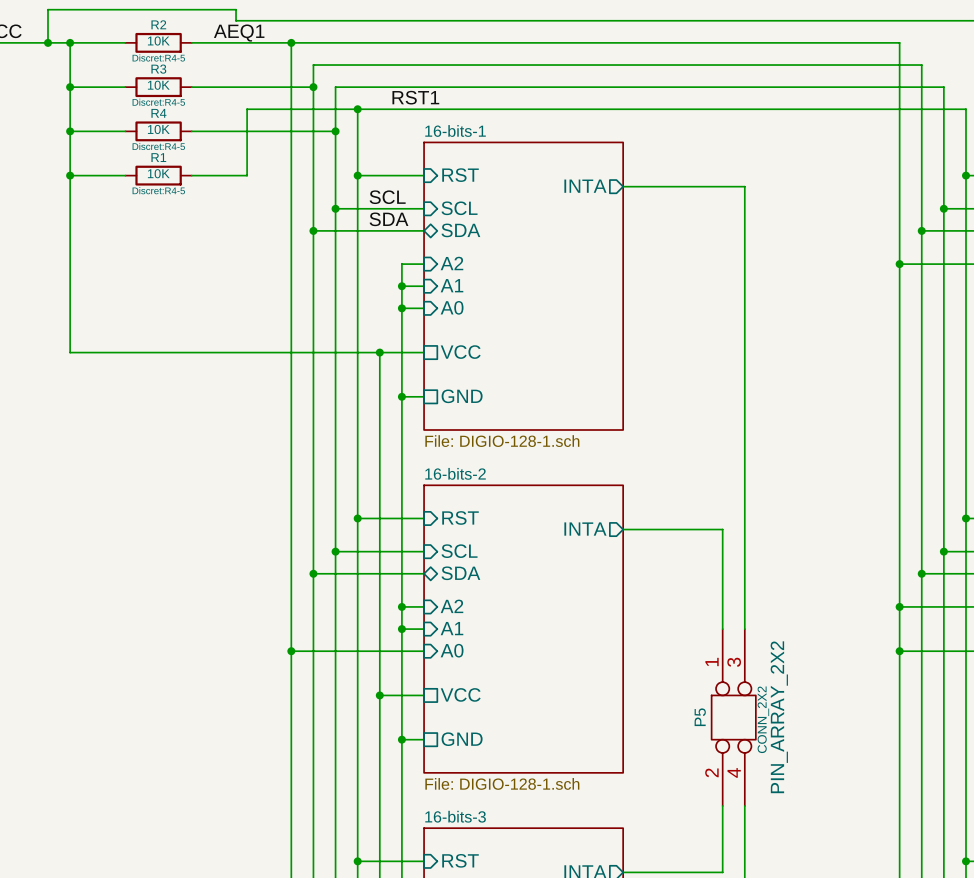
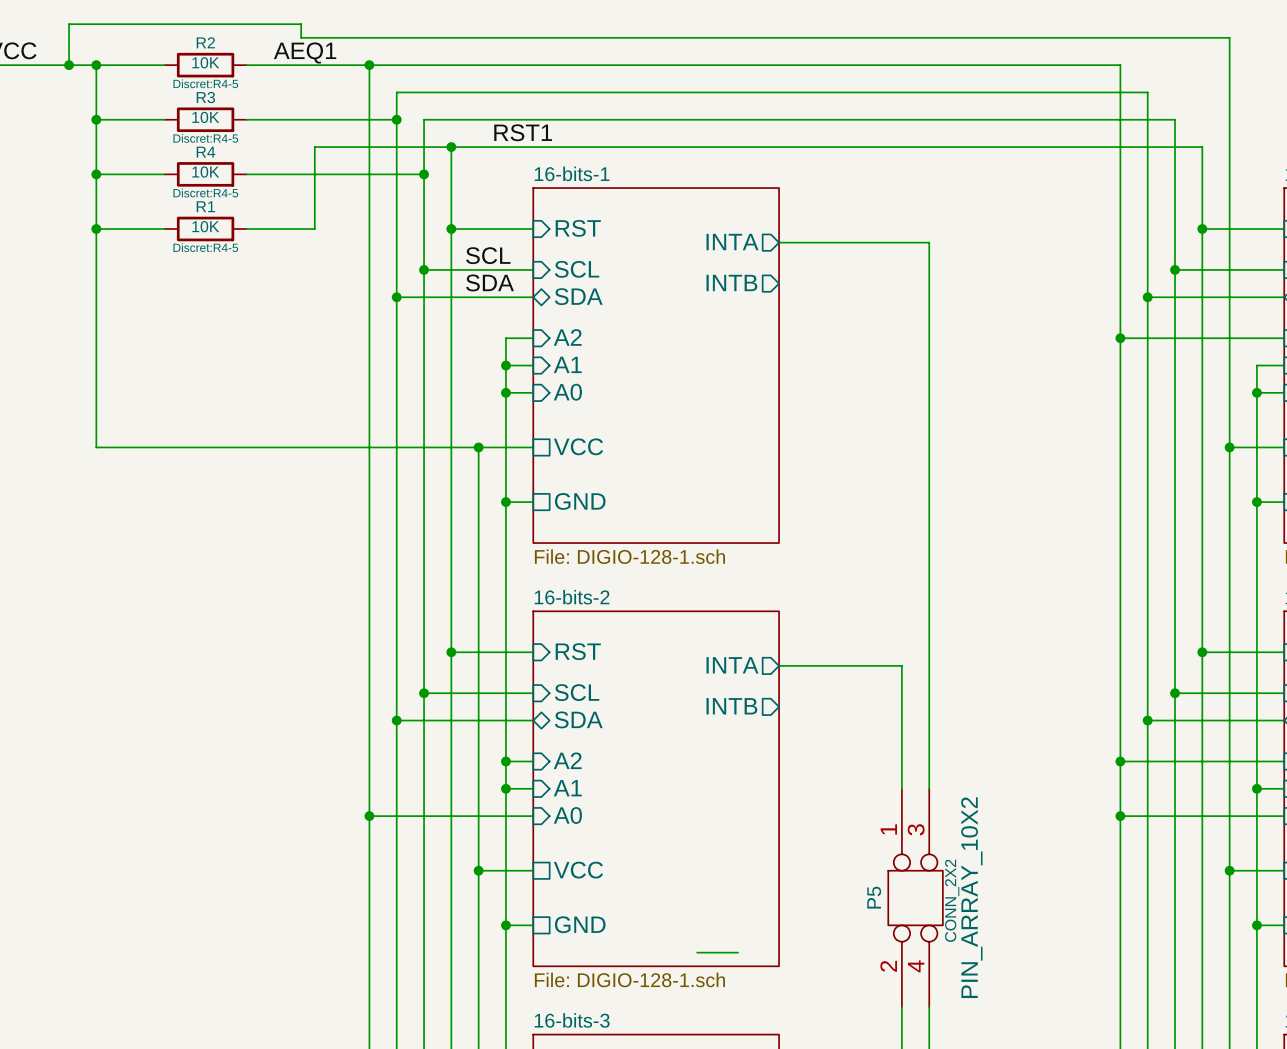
sheet pin: none -> INTB (731, 282)
sheet pin: none -> INTB (731, 706)
P5 text: PIN_ARRAY_2X2 (779, 717) -> PIN_ARRAY_10X2 (971, 897)
wire: none -> (697, 952) (738, 952)

